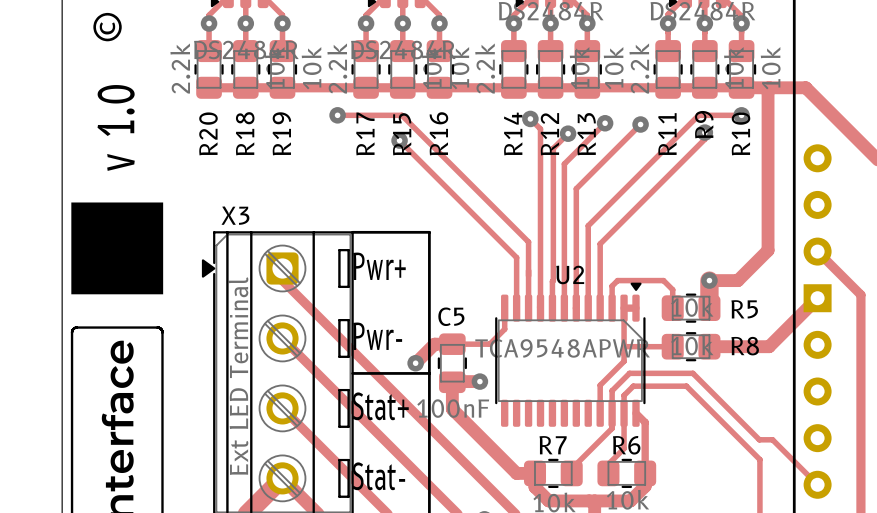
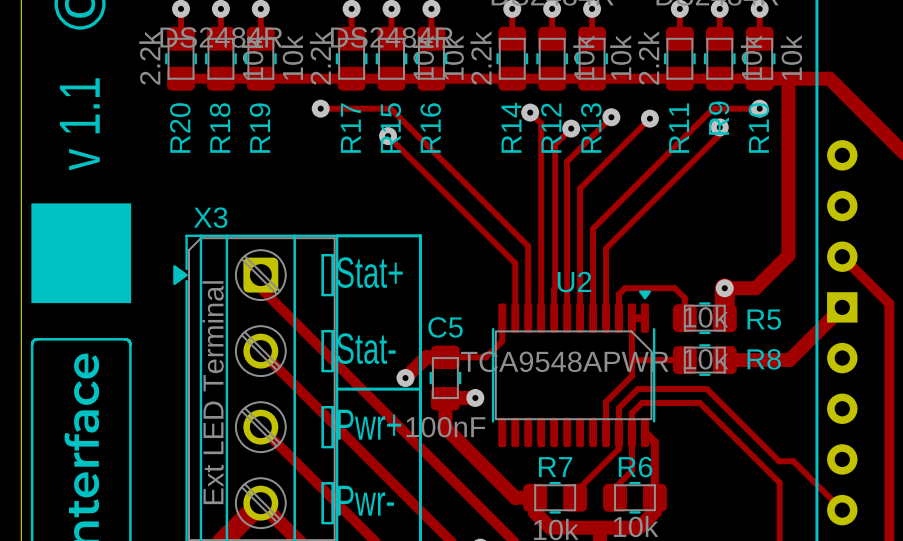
text: v 1.0 (116, 127) -> v 1.1 (79, 124)
text: Pwr+ (379, 266) -> Stat+ (369, 272)
text: Pwr- (377, 336) -> Stat- (366, 348)
text: Stat+ (380, 406) -> Pwr+ (369, 424)
text: Stat- (378, 476) -> Pwr- (366, 500)

